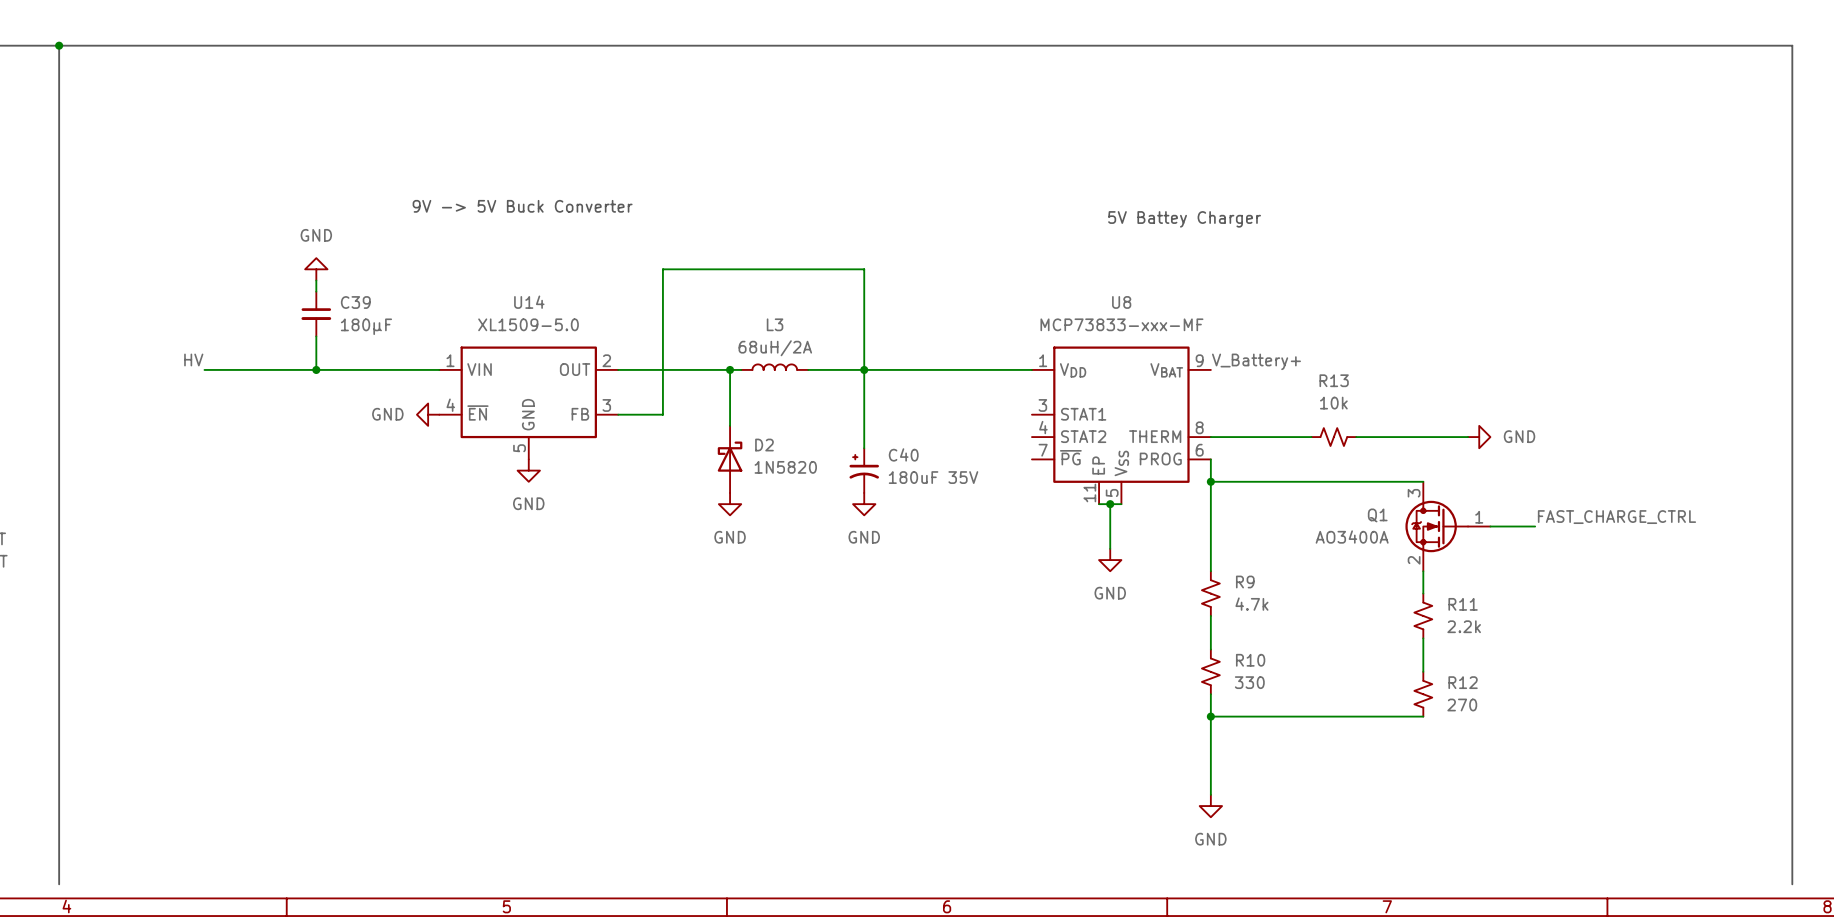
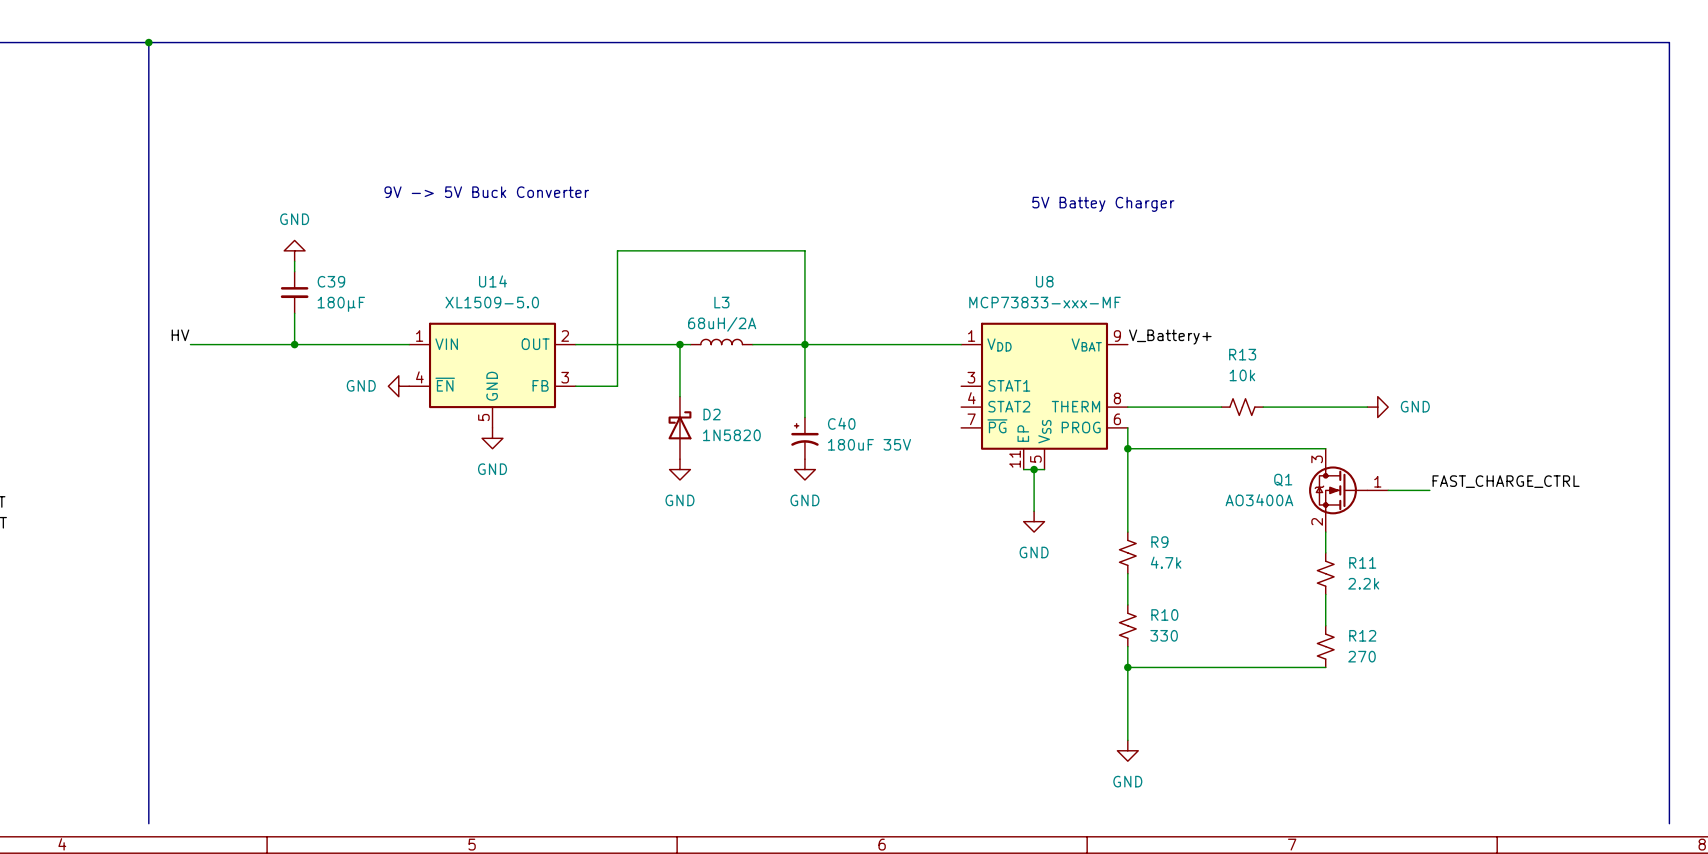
bus: (59, 45) (59, 884) -> (148, 42) (148, 823)
junction: (59, 45) -> none
junction: none -> (148, 42)

